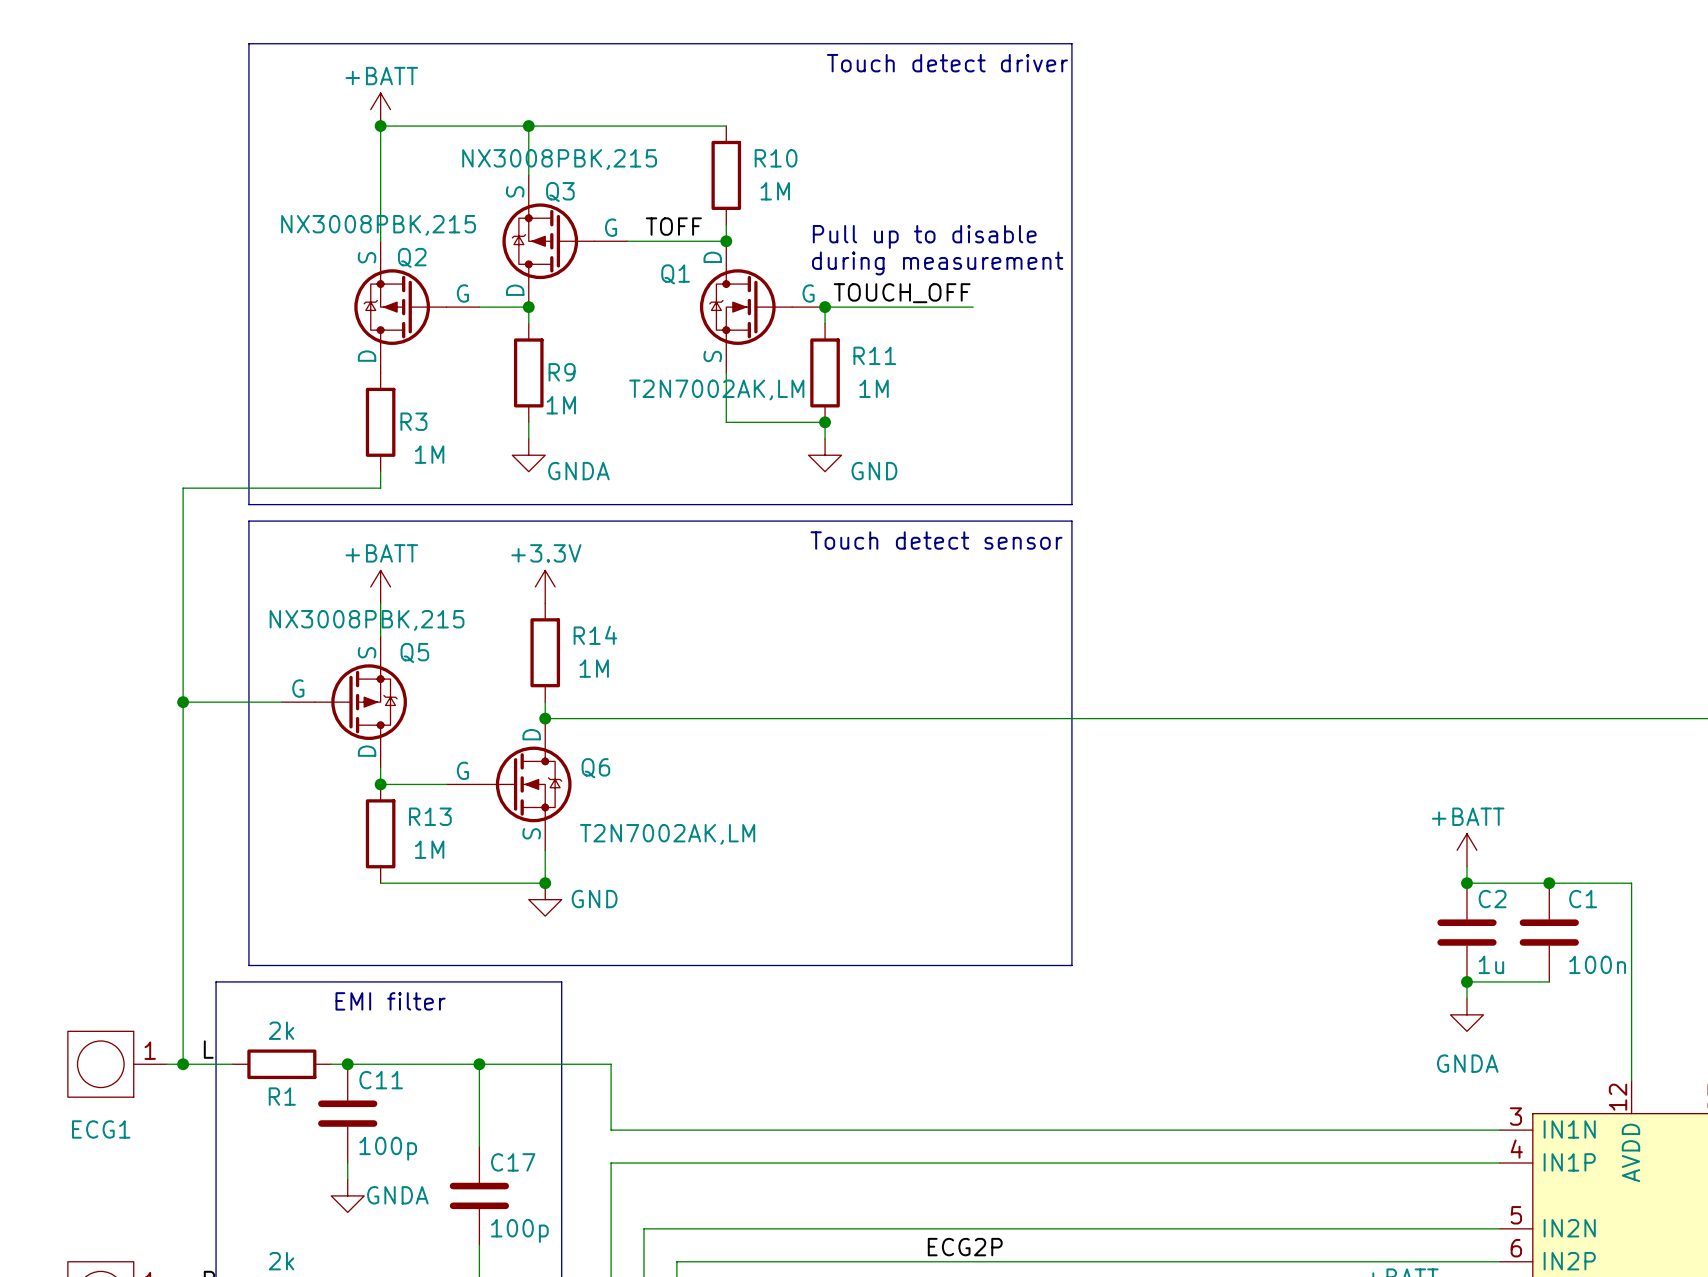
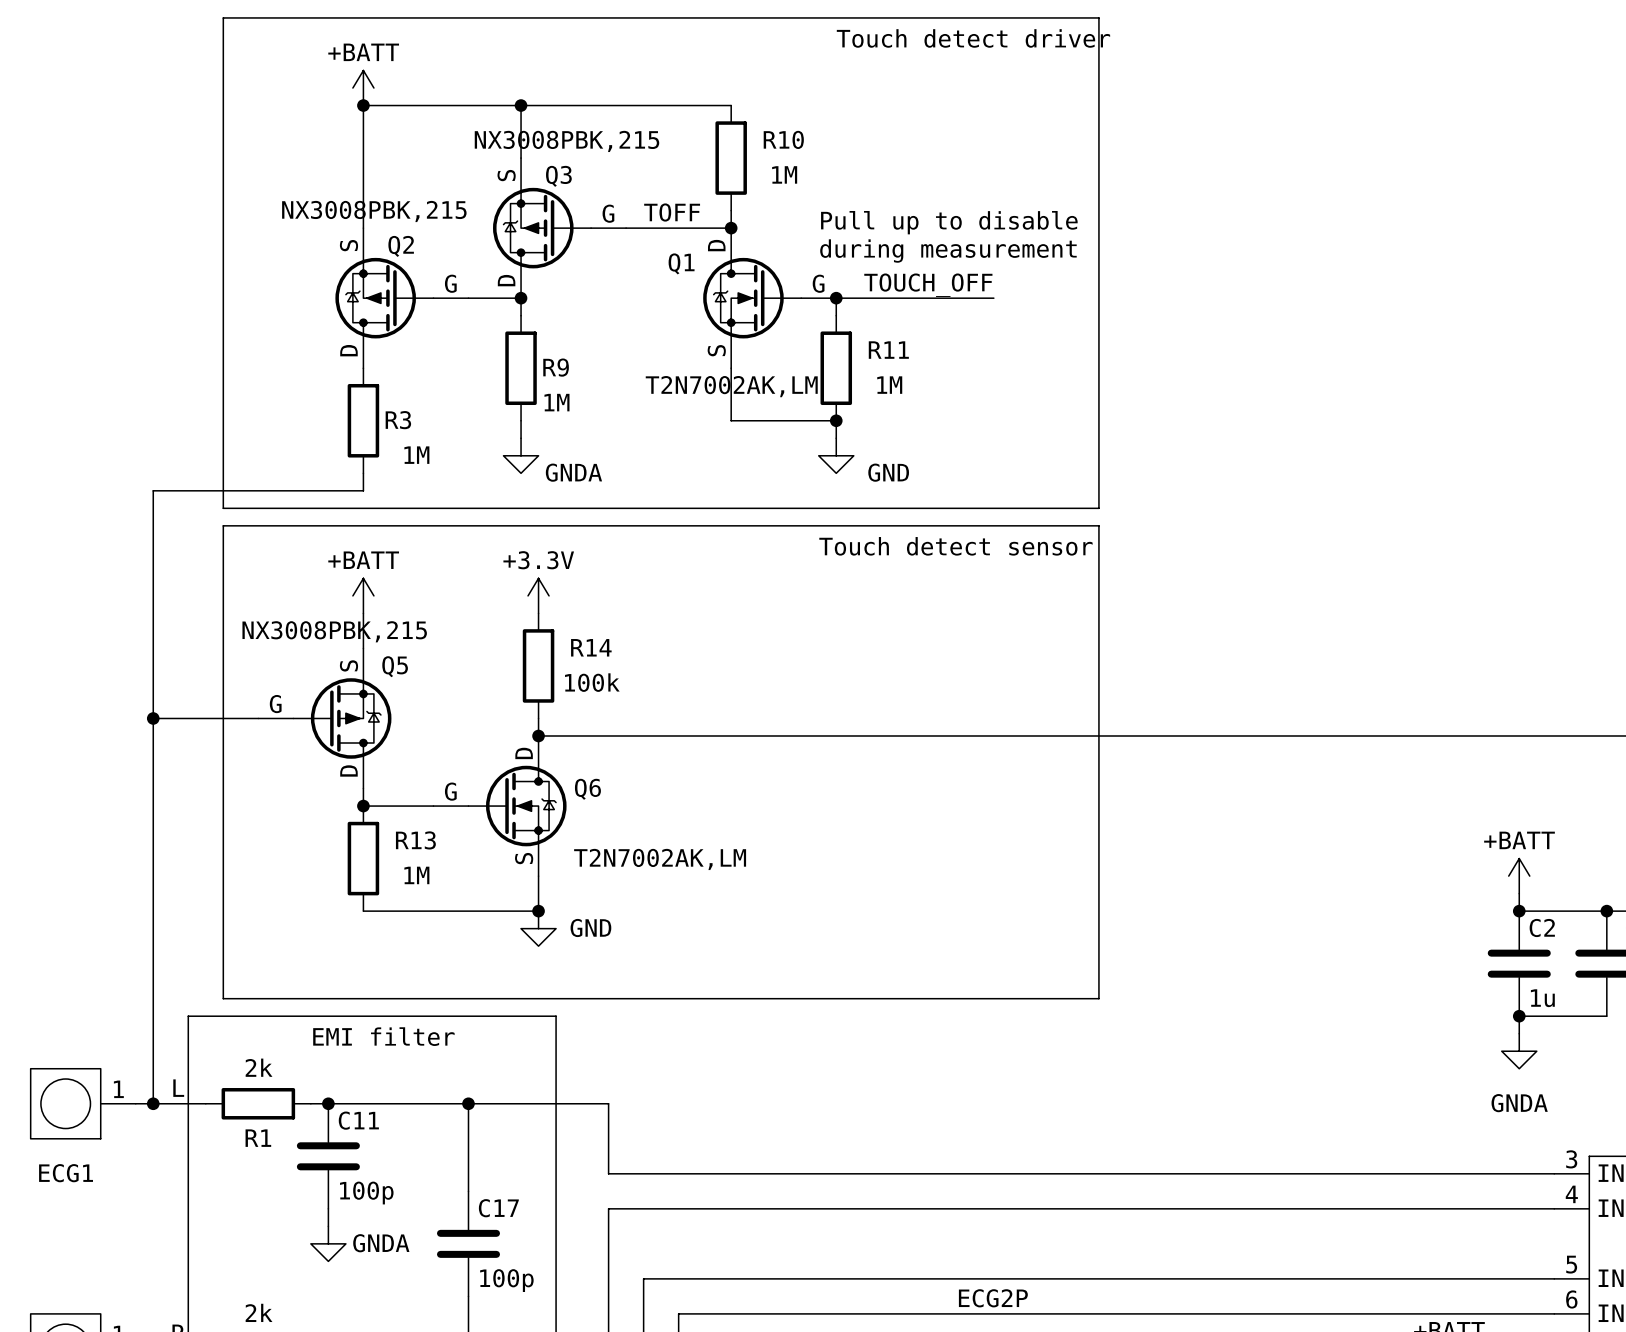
R14 value: 1M (594, 668) -> 100k (592, 682)

